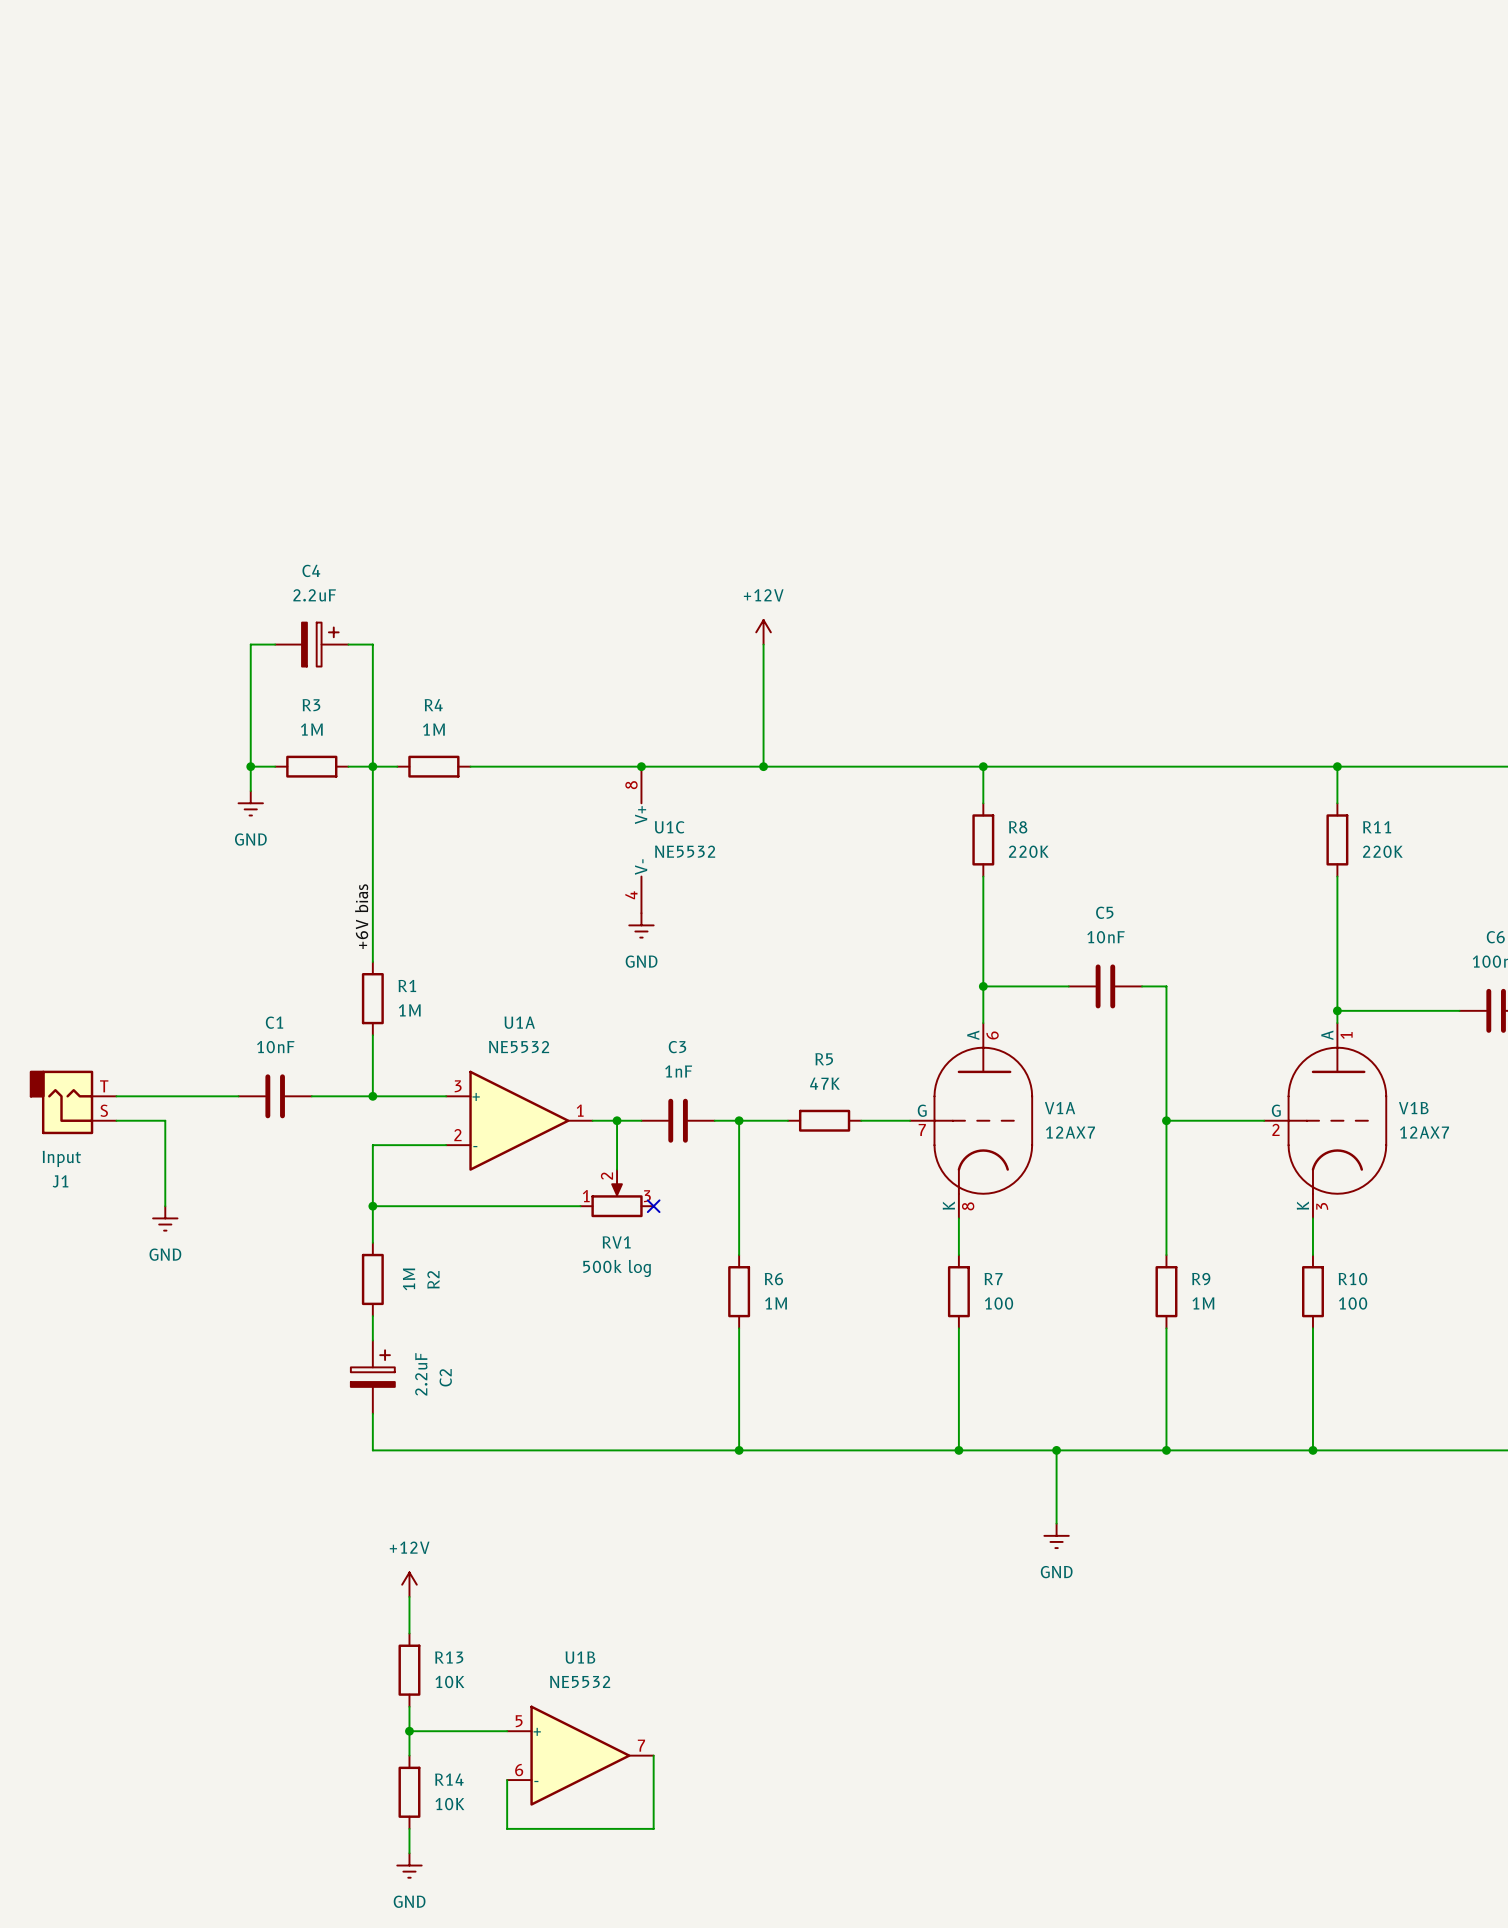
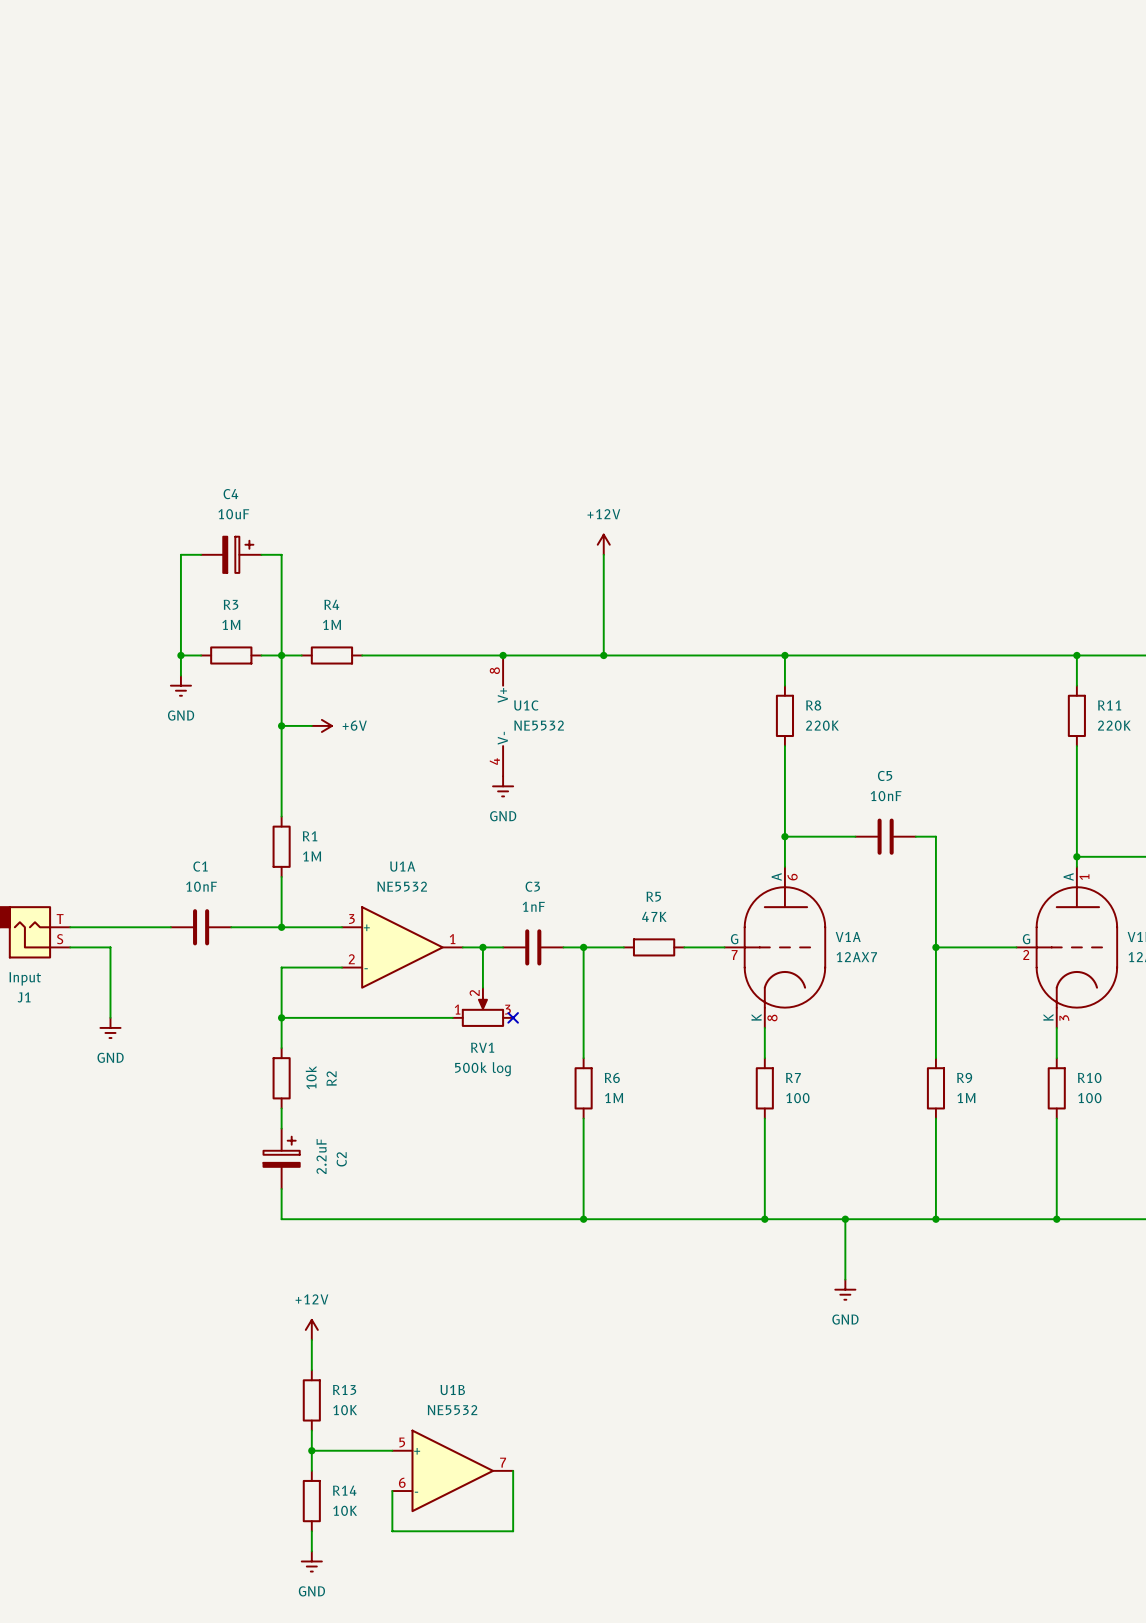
C4 value: 2.2uF (314, 595) -> 10uF (233, 514)
wire: none -> (281, 725) (311, 725)
junction: none -> (281, 725)
power symbol: none -> +6V (321, 725)
label: +6V bias (361, 916) -> none
R2 value: 1M (409, 1279) -> 10k (311, 1077)

